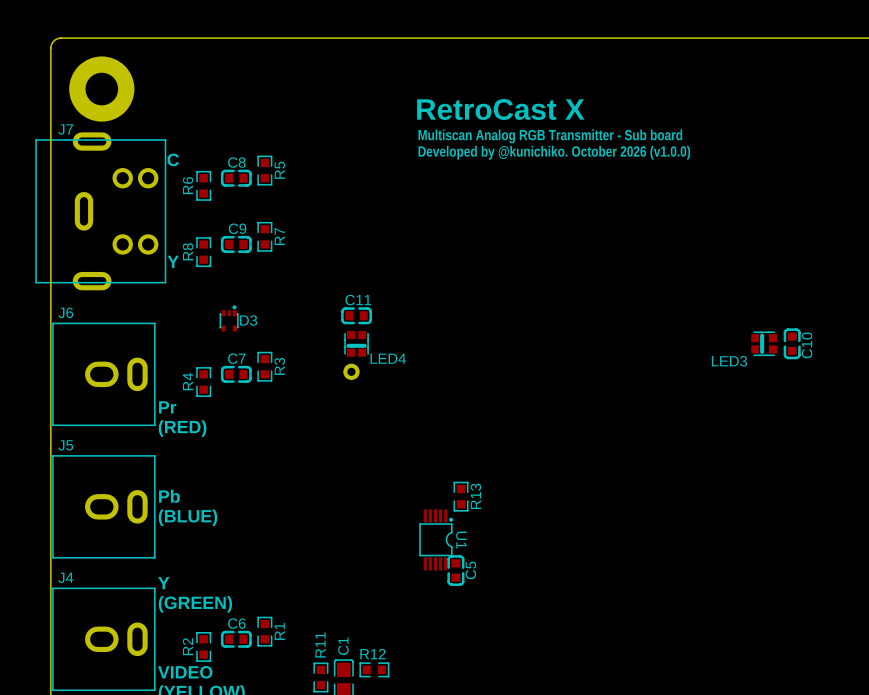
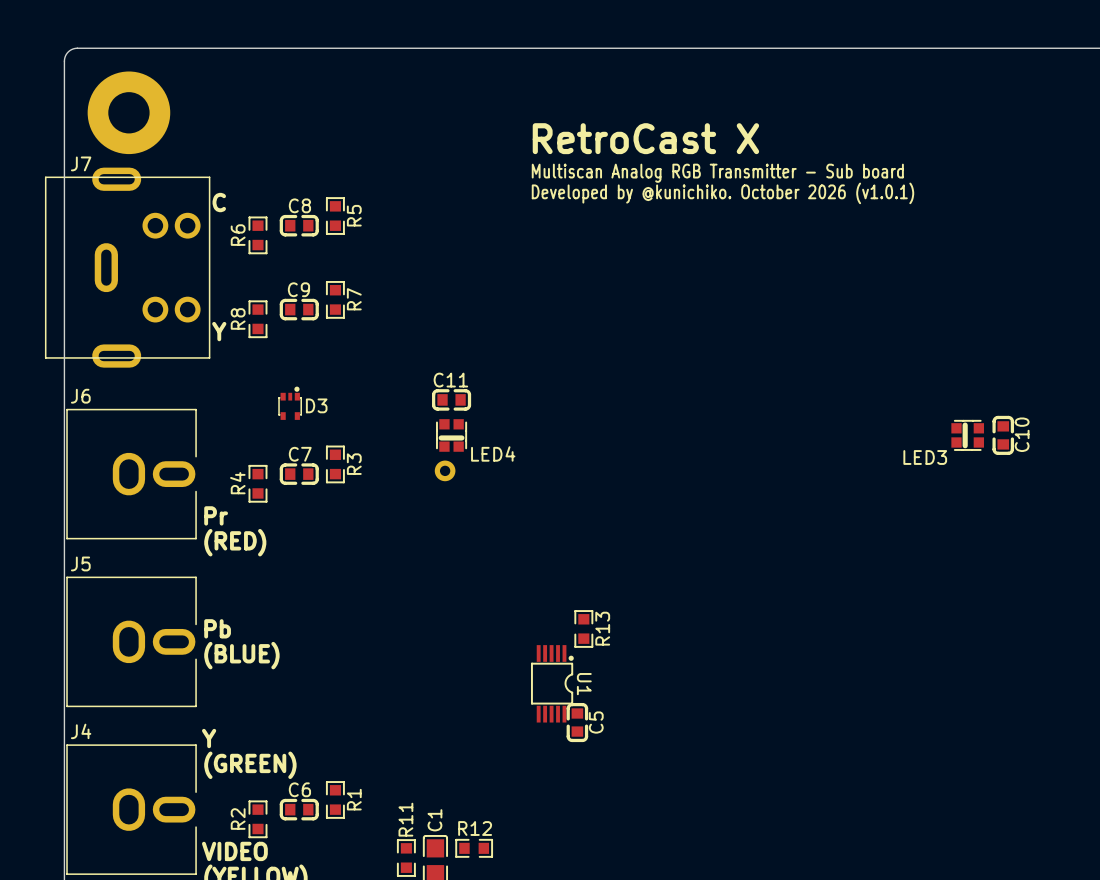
text: Developed by @kunichiko. October 2026 (v1.0.0) (554, 152) -> Developed by @kunichiko. October 2026 (v1.0.1) (722, 193)
J6 footprint: [52, 322, 156, 426] -> [66, 408, 197, 540]
J5 footprint: [52, 455, 156, 559] -> [66, 576, 197, 708]
J4 footprint: [52, 587, 156, 691] -> [66, 744, 197, 875]

